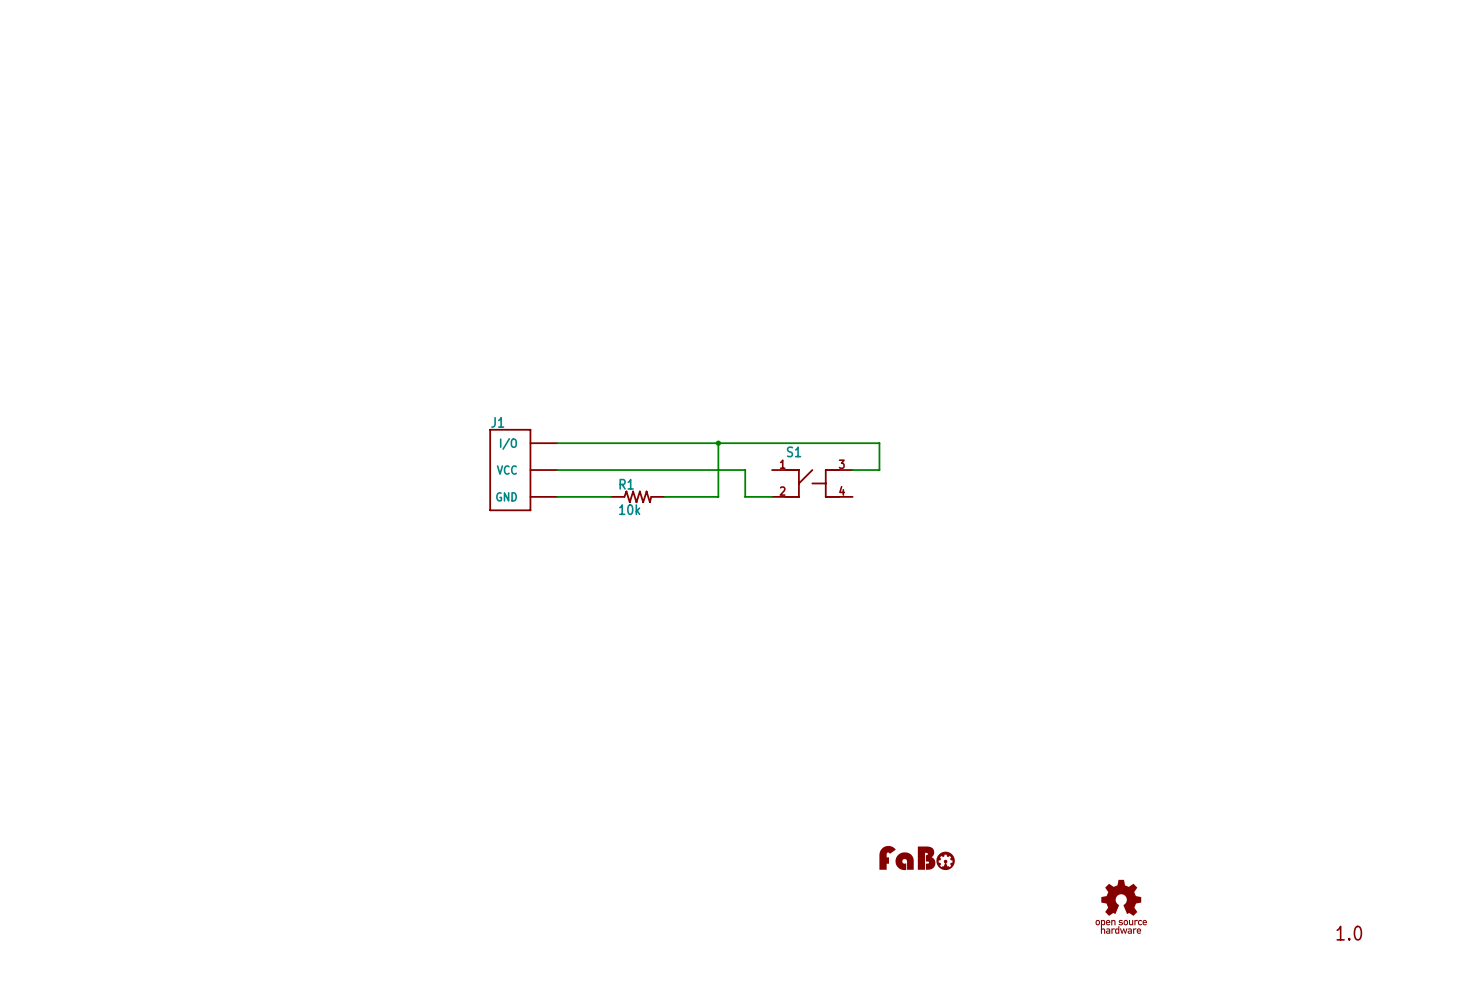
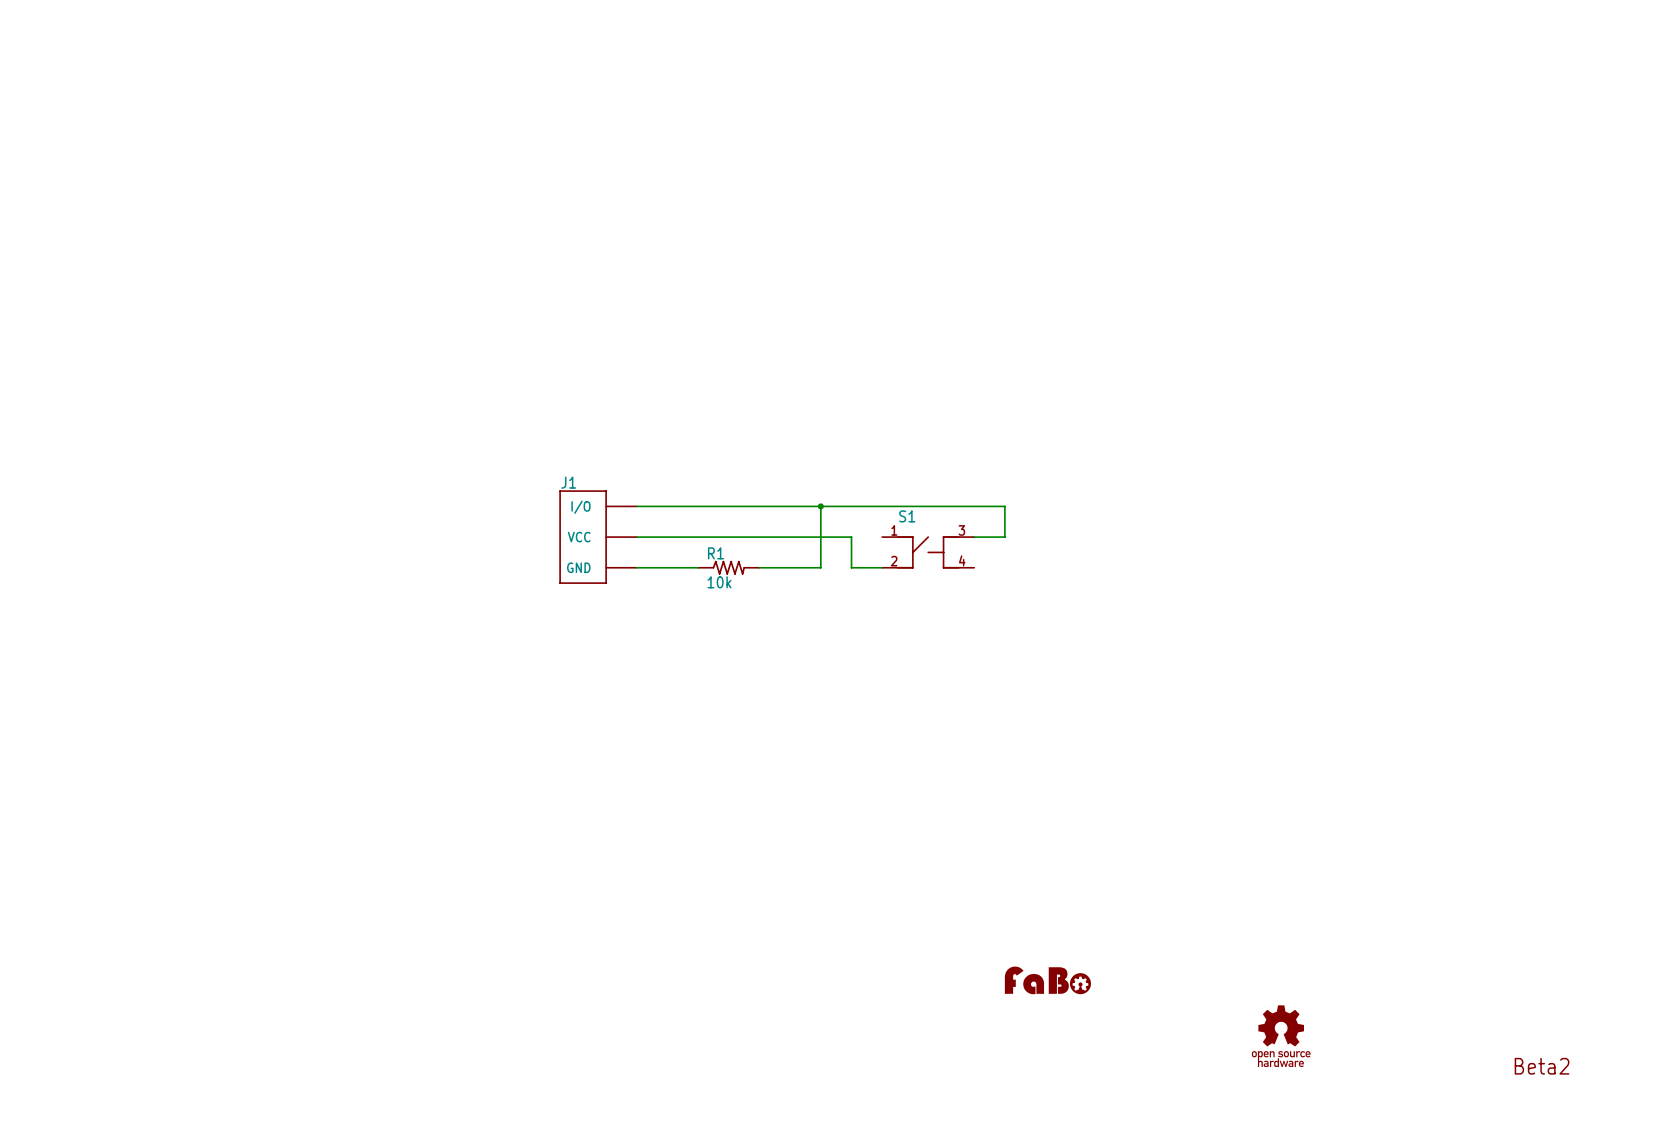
text: 1.0 (1349, 933) -> Beta2 (1542, 1066)

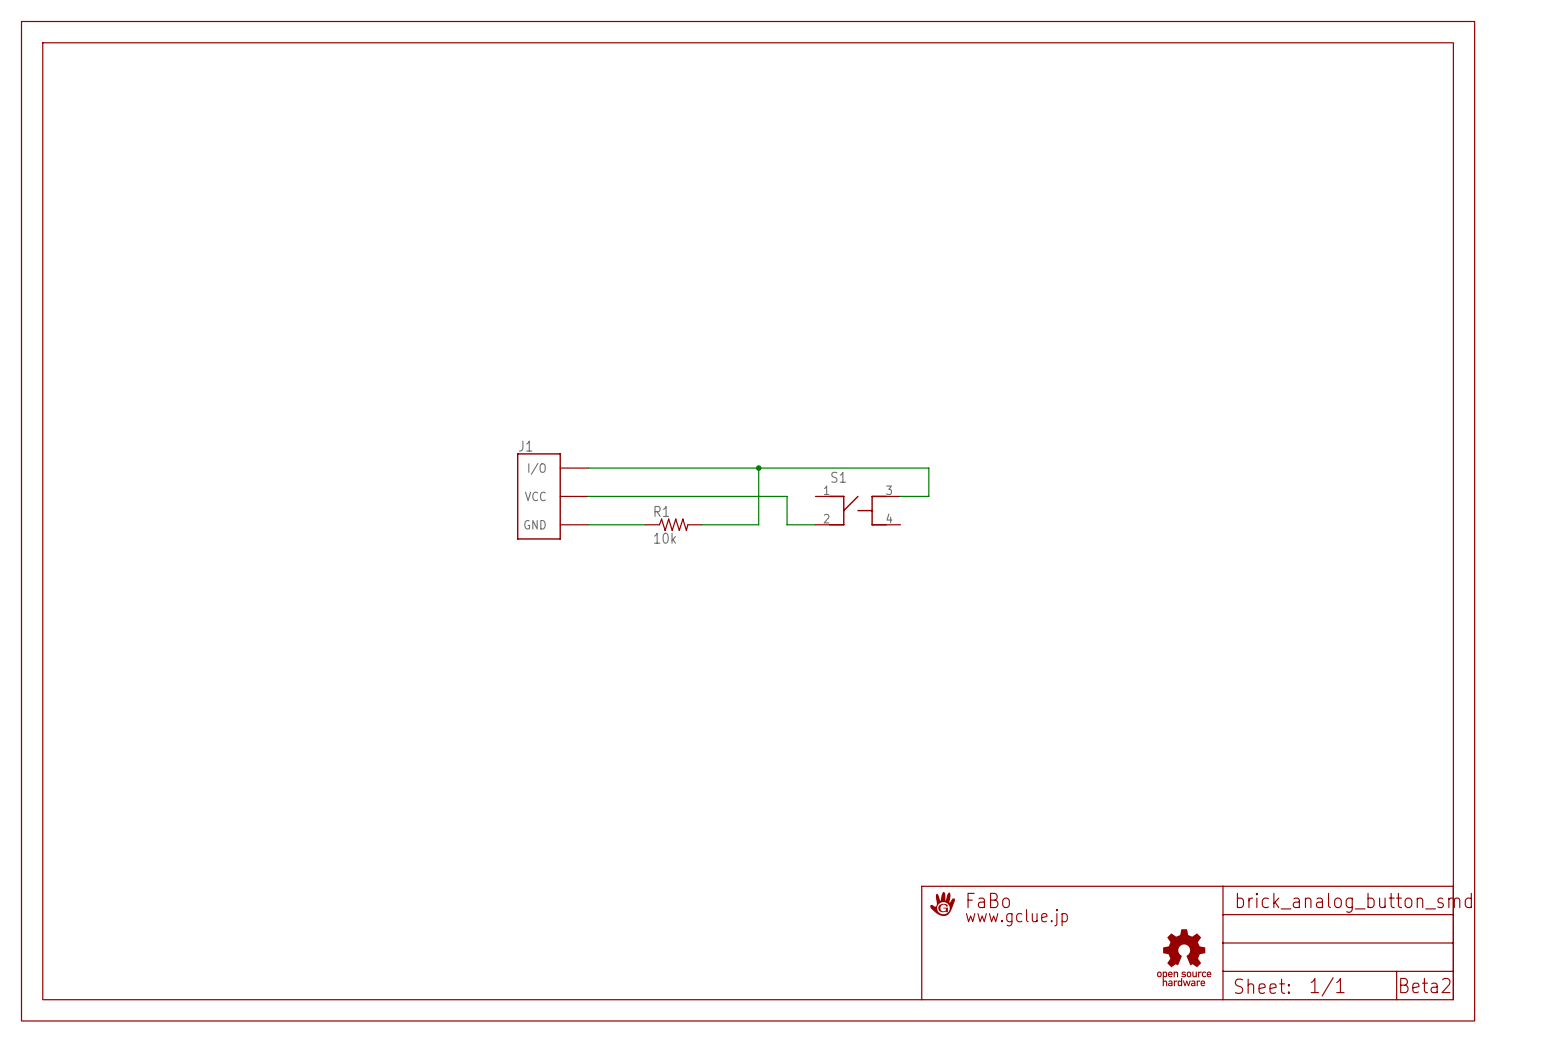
part: none -> (748, 521)
part: (1047, 980) -> none

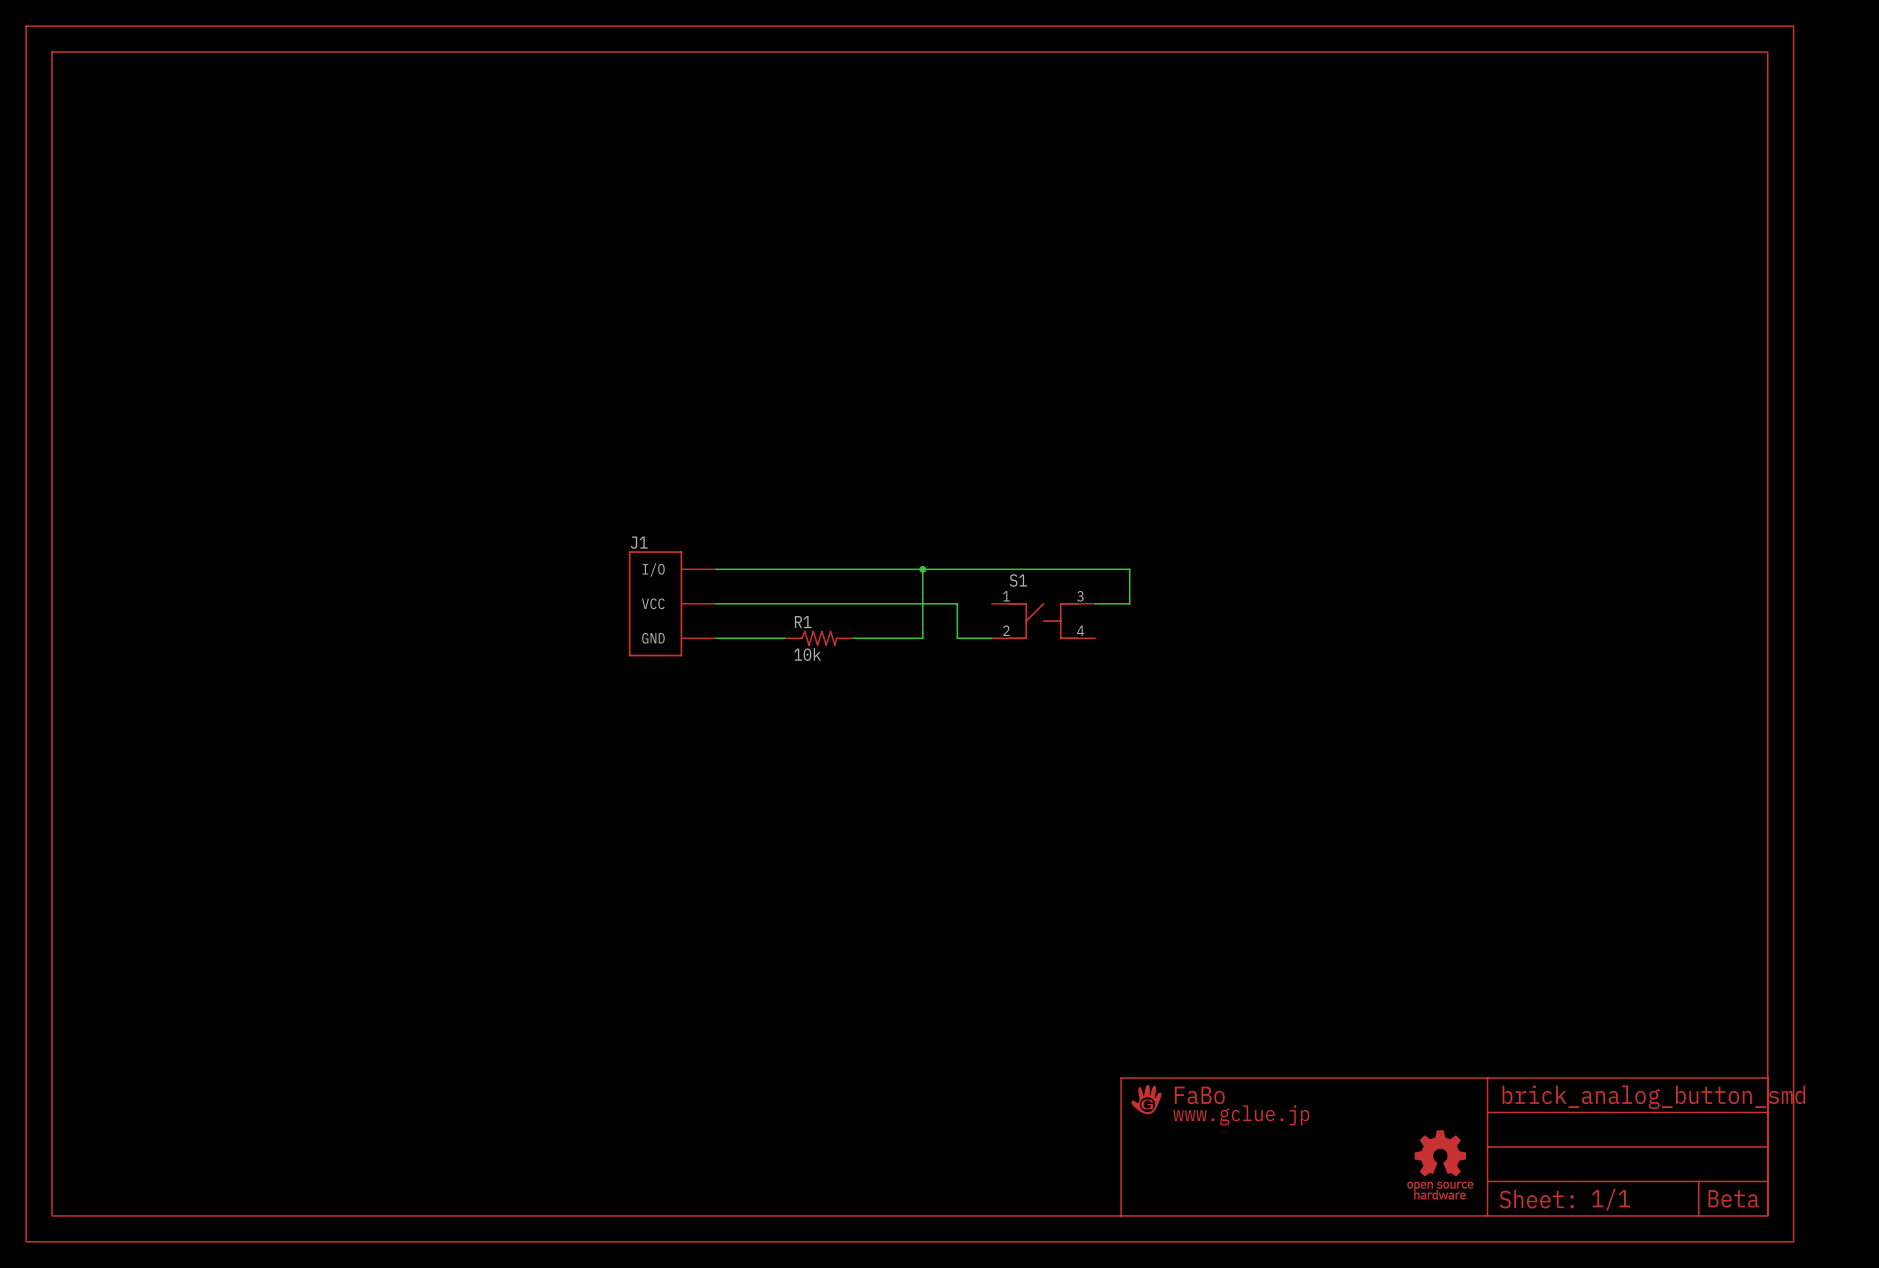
text: Beta2 (1425, 985) -> Beta (1733, 1198)

